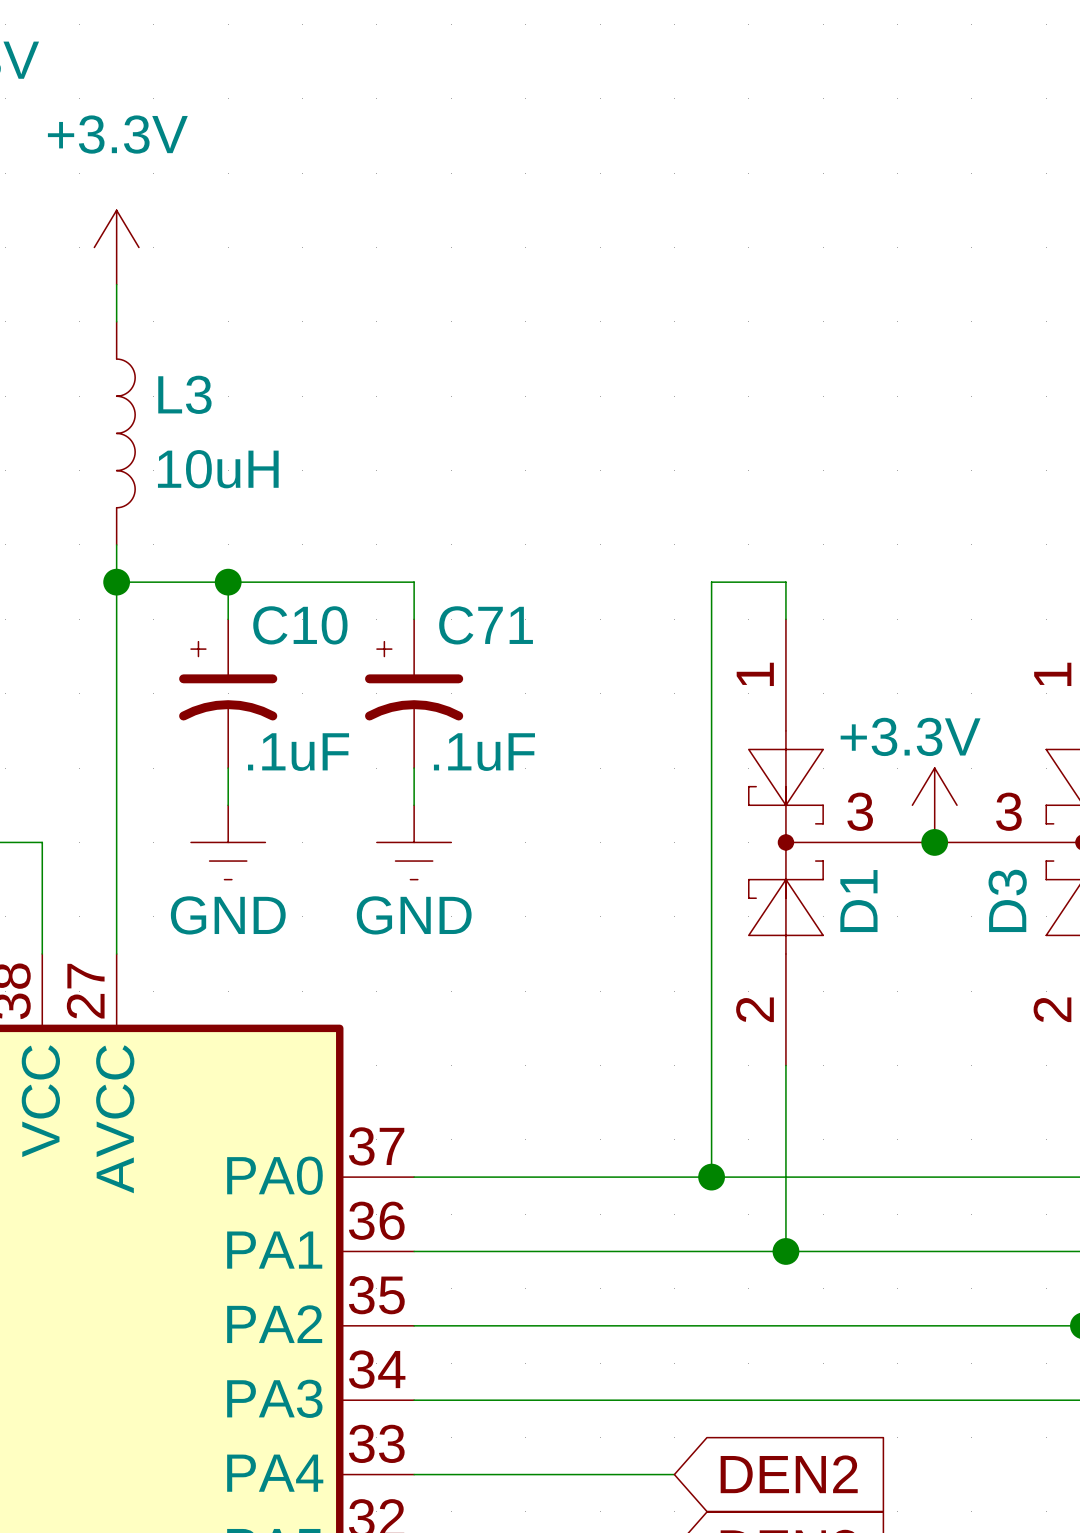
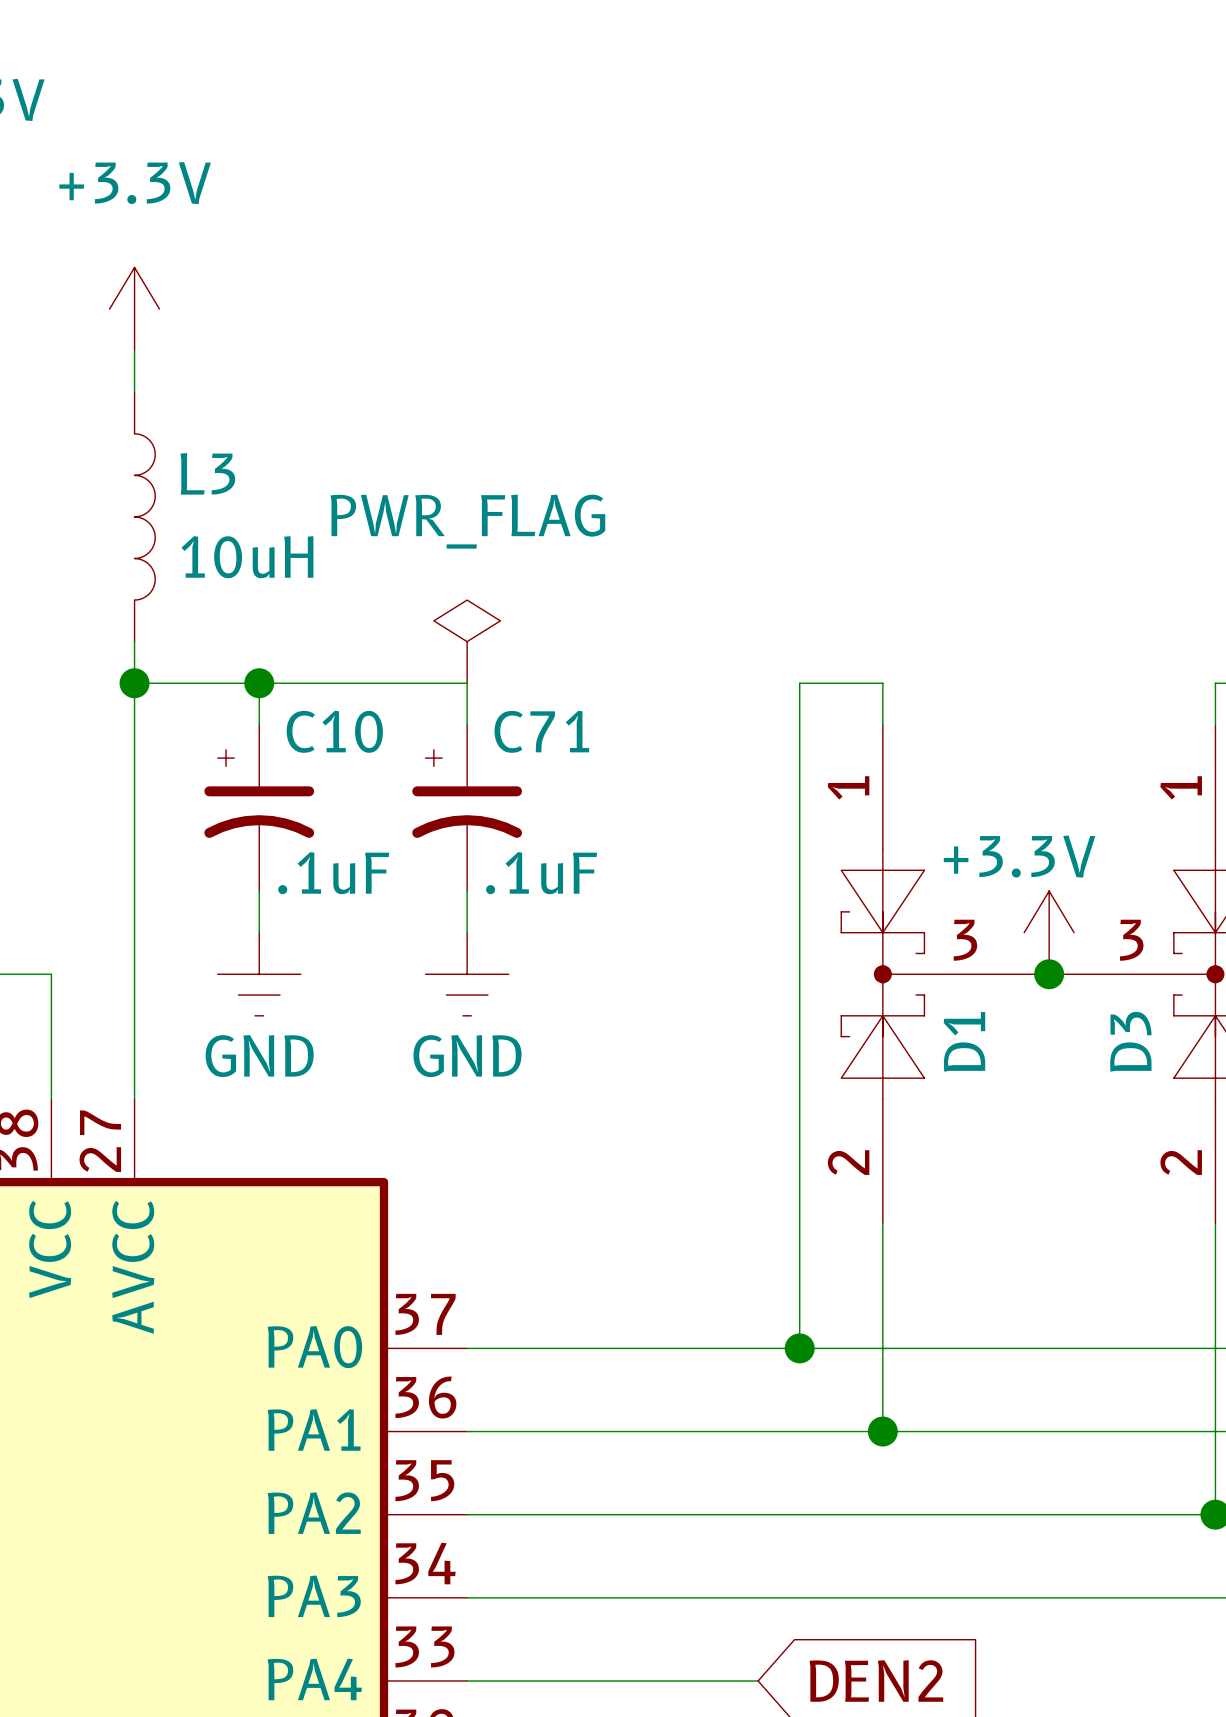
power symbol: none -> PWR_FLAG (467, 641)

